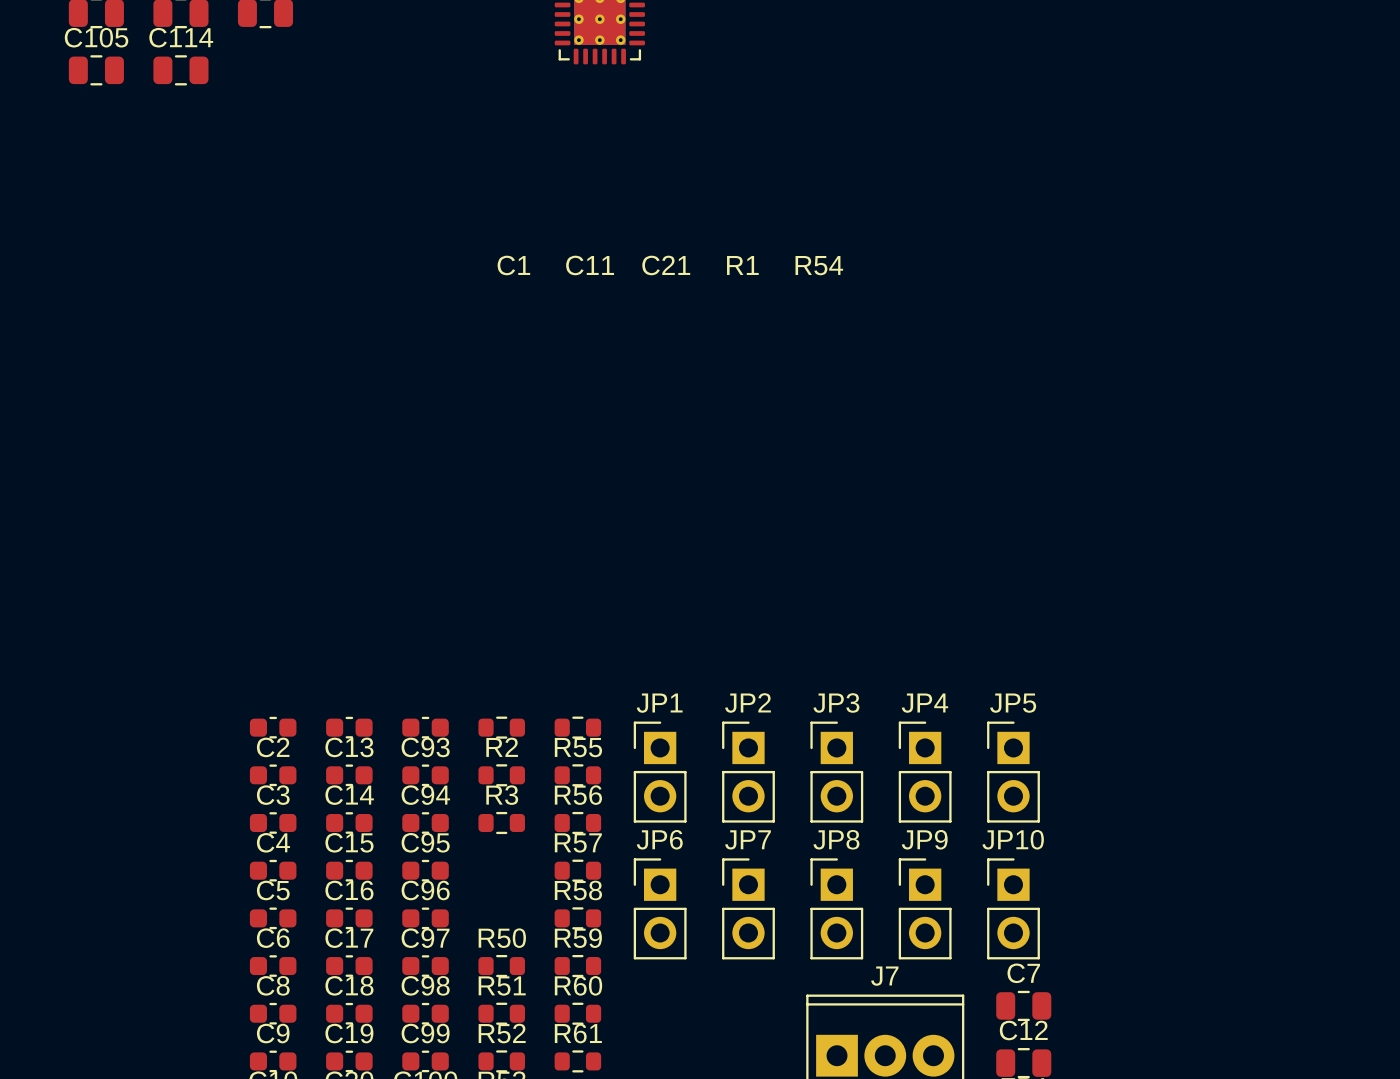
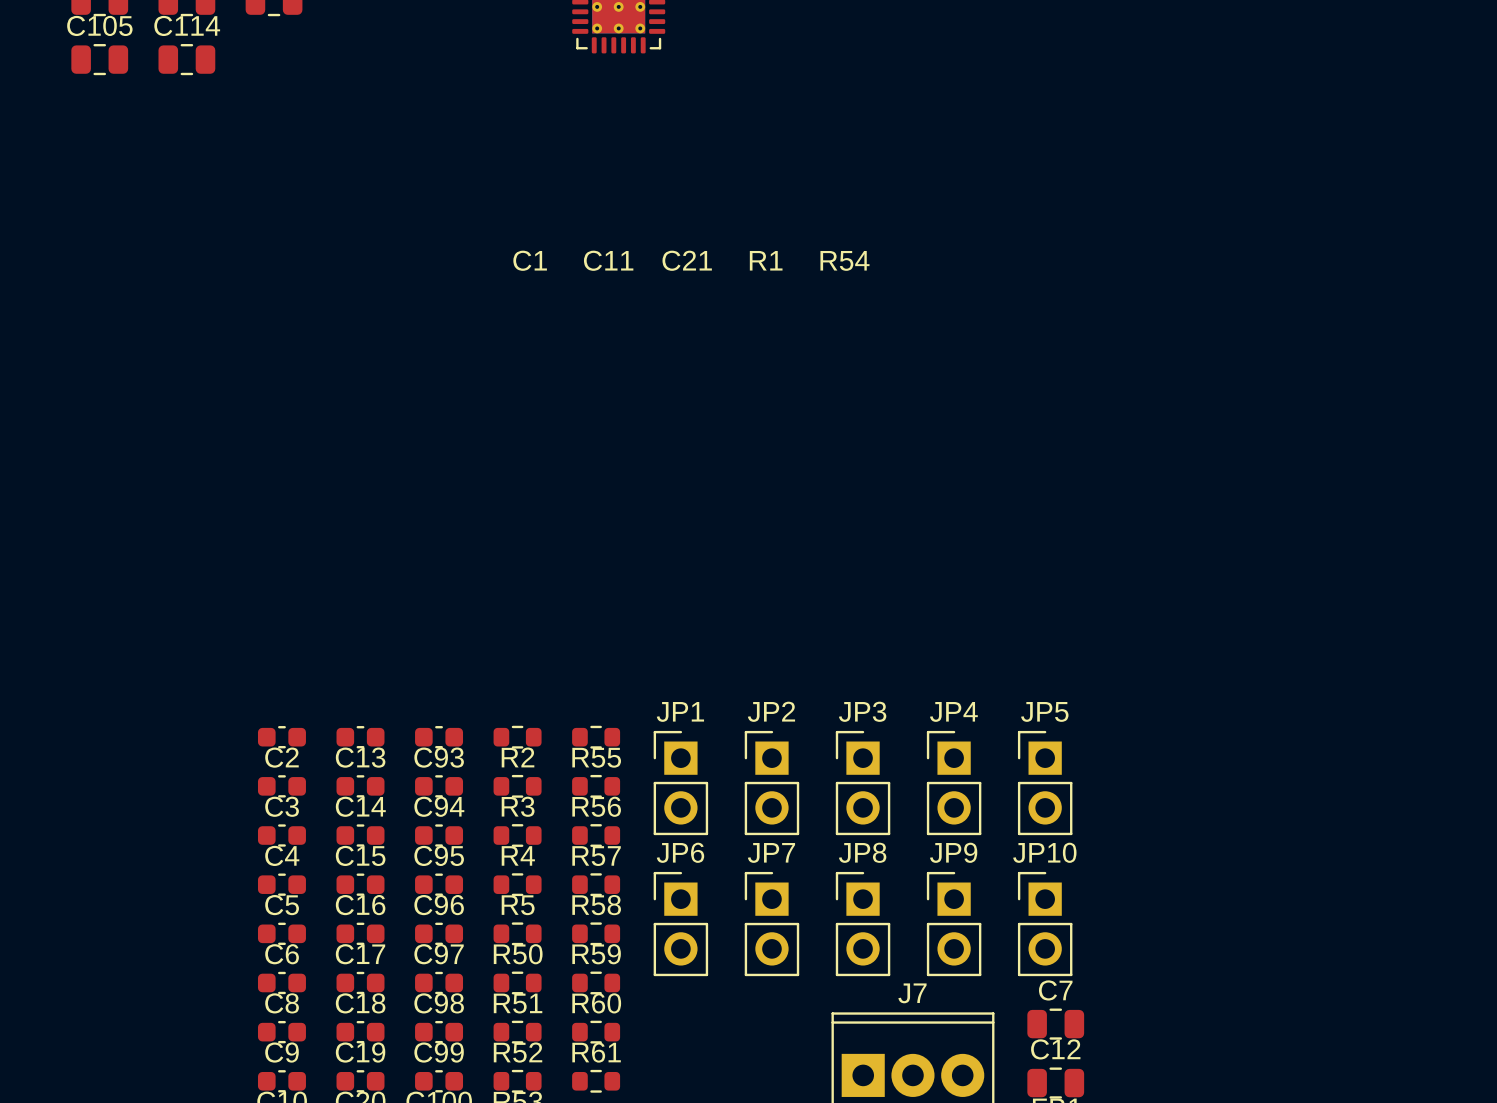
R4: none -> (517, 884)
R5: none -> (517, 933)

